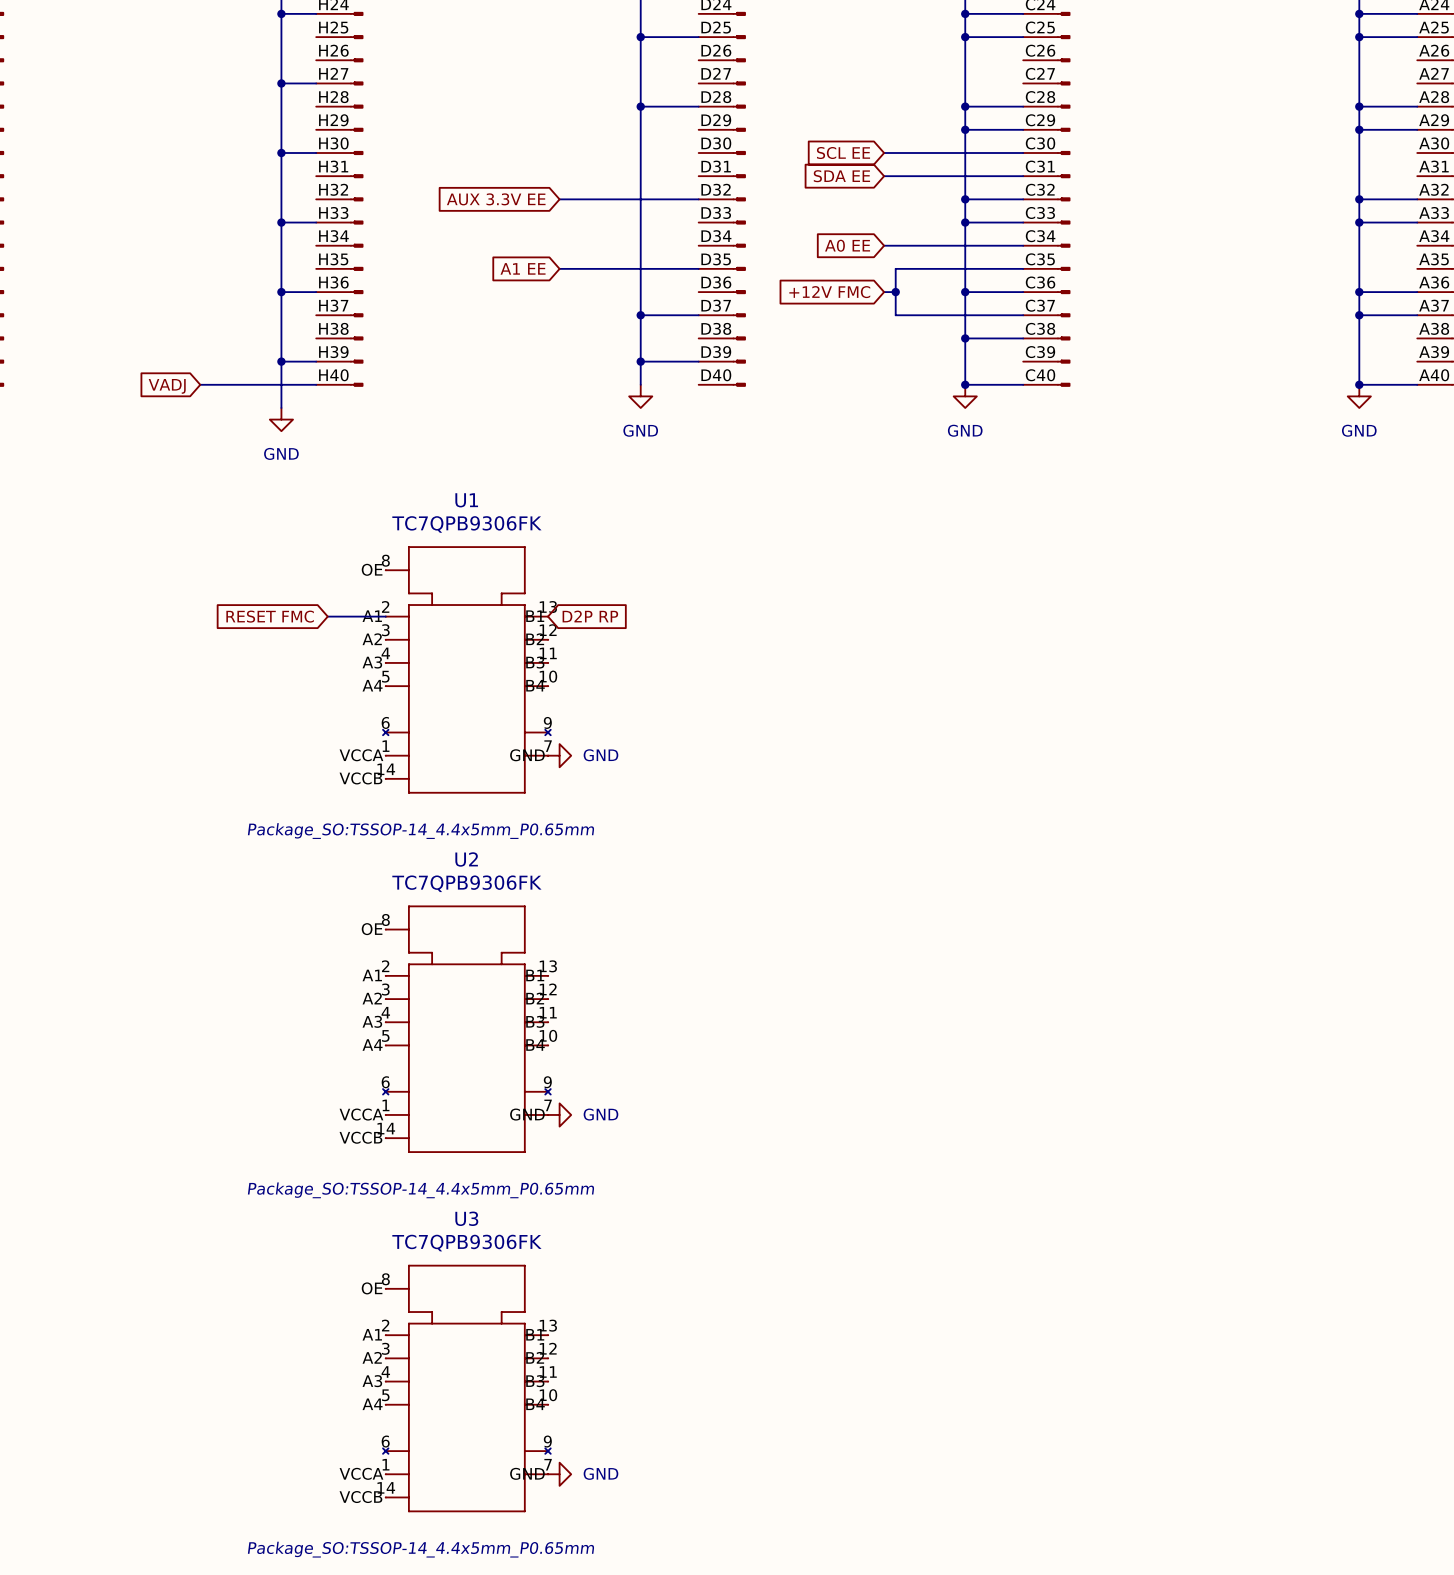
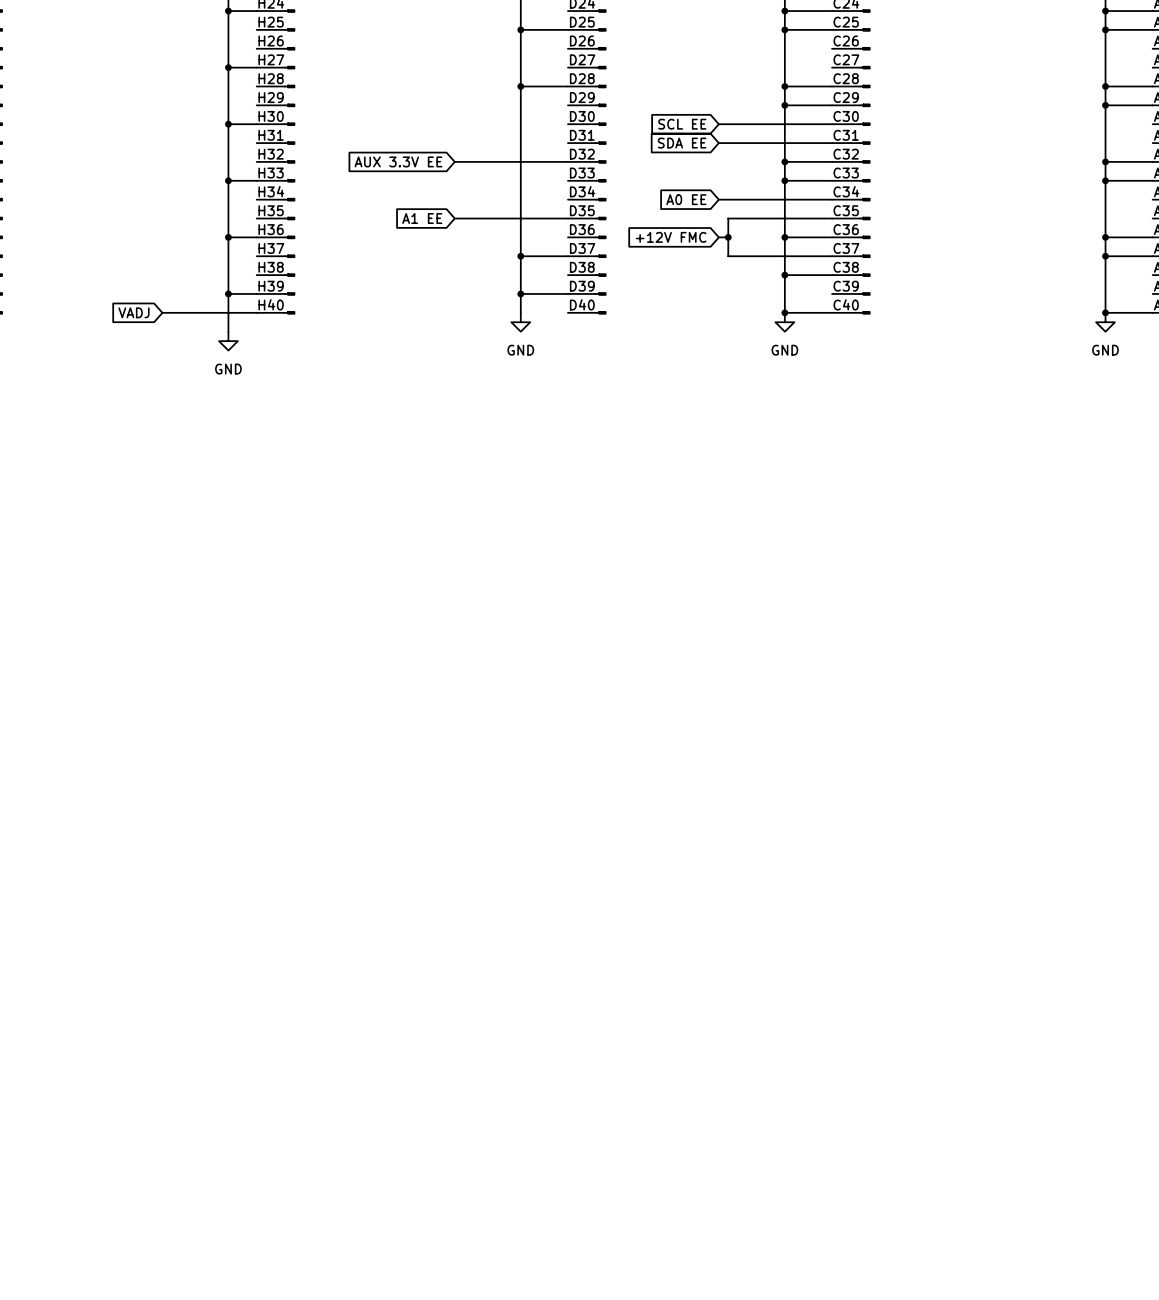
global label: RESET FMC (270, 616) -> none
wire: (327, 616) (385, 616) -> none
global label: D2P RP (590, 616) -> none
U1: TC7QPB9306FK (466, 670) -> none
power symbol: GND (559, 755) -> none
U2: TC7QPB9306FK (466, 1029) -> none
power symbol: GND (559, 1114) -> none
U3: TC7QPB9306FK (466, 1388) -> none
power symbol: GND (559, 1474) -> none

